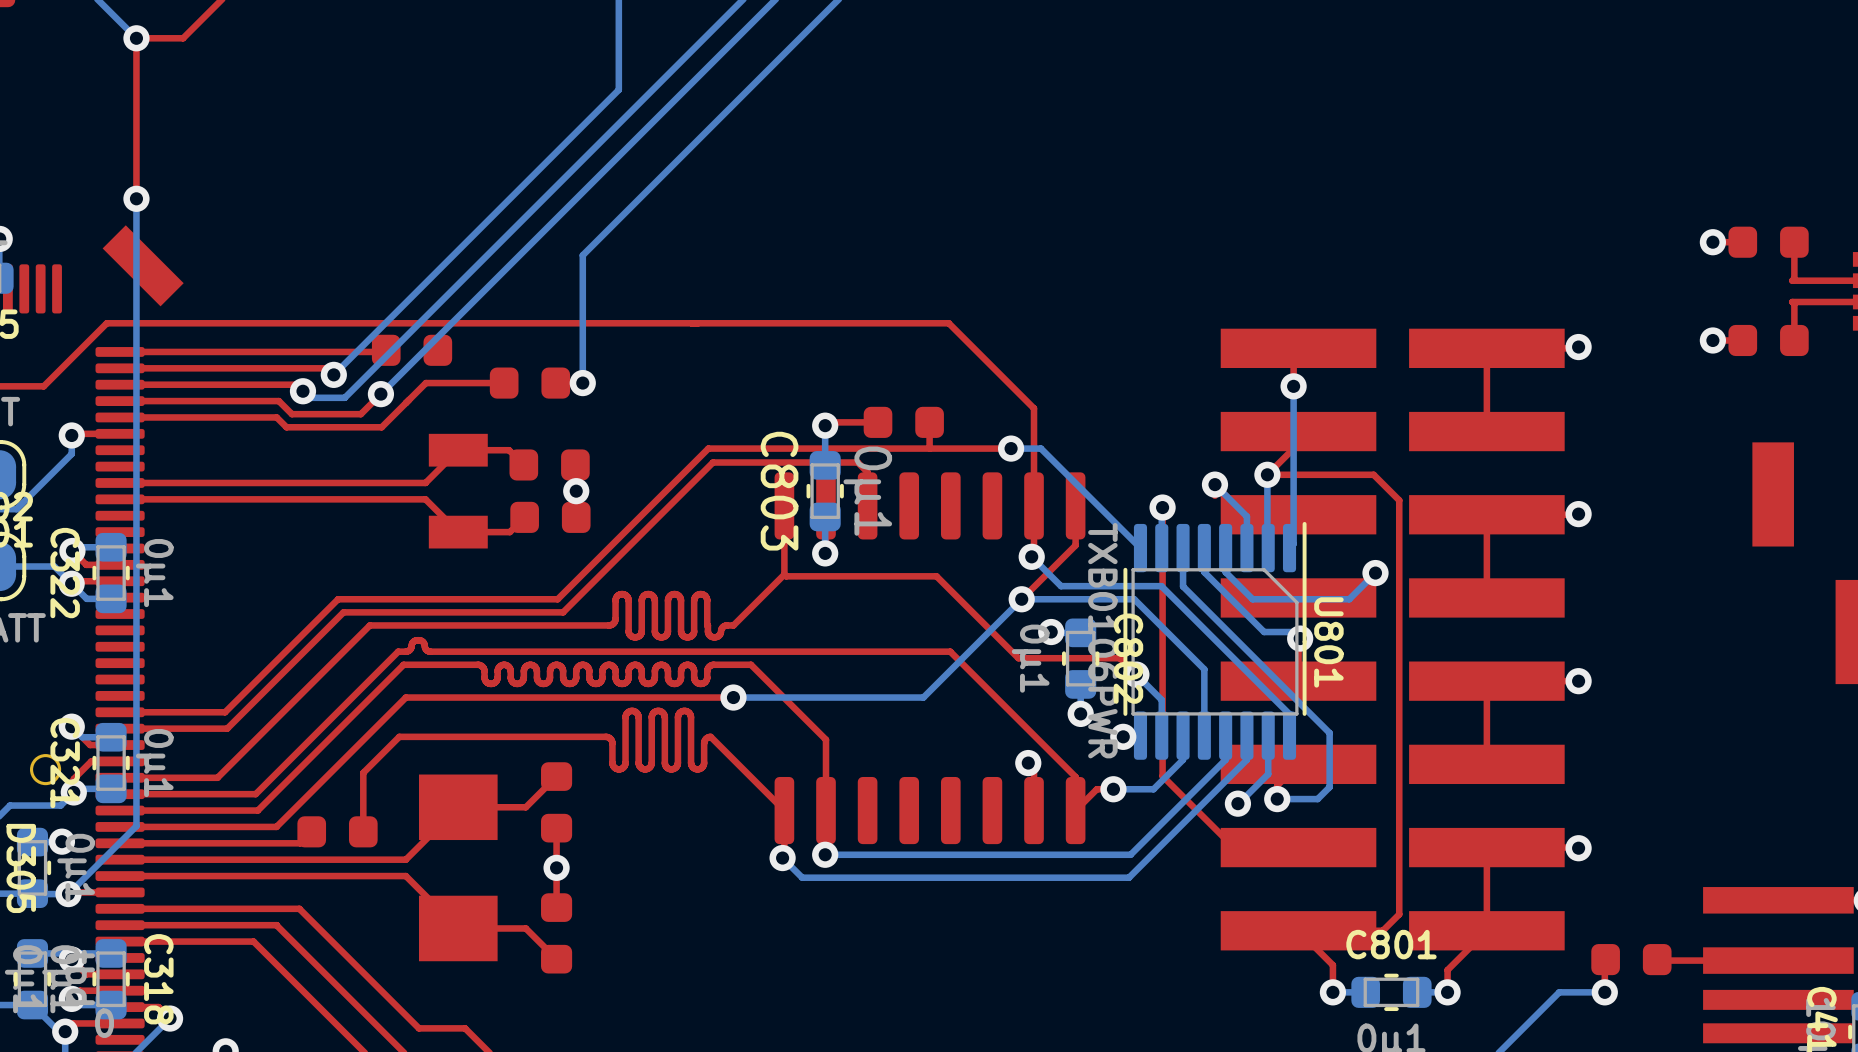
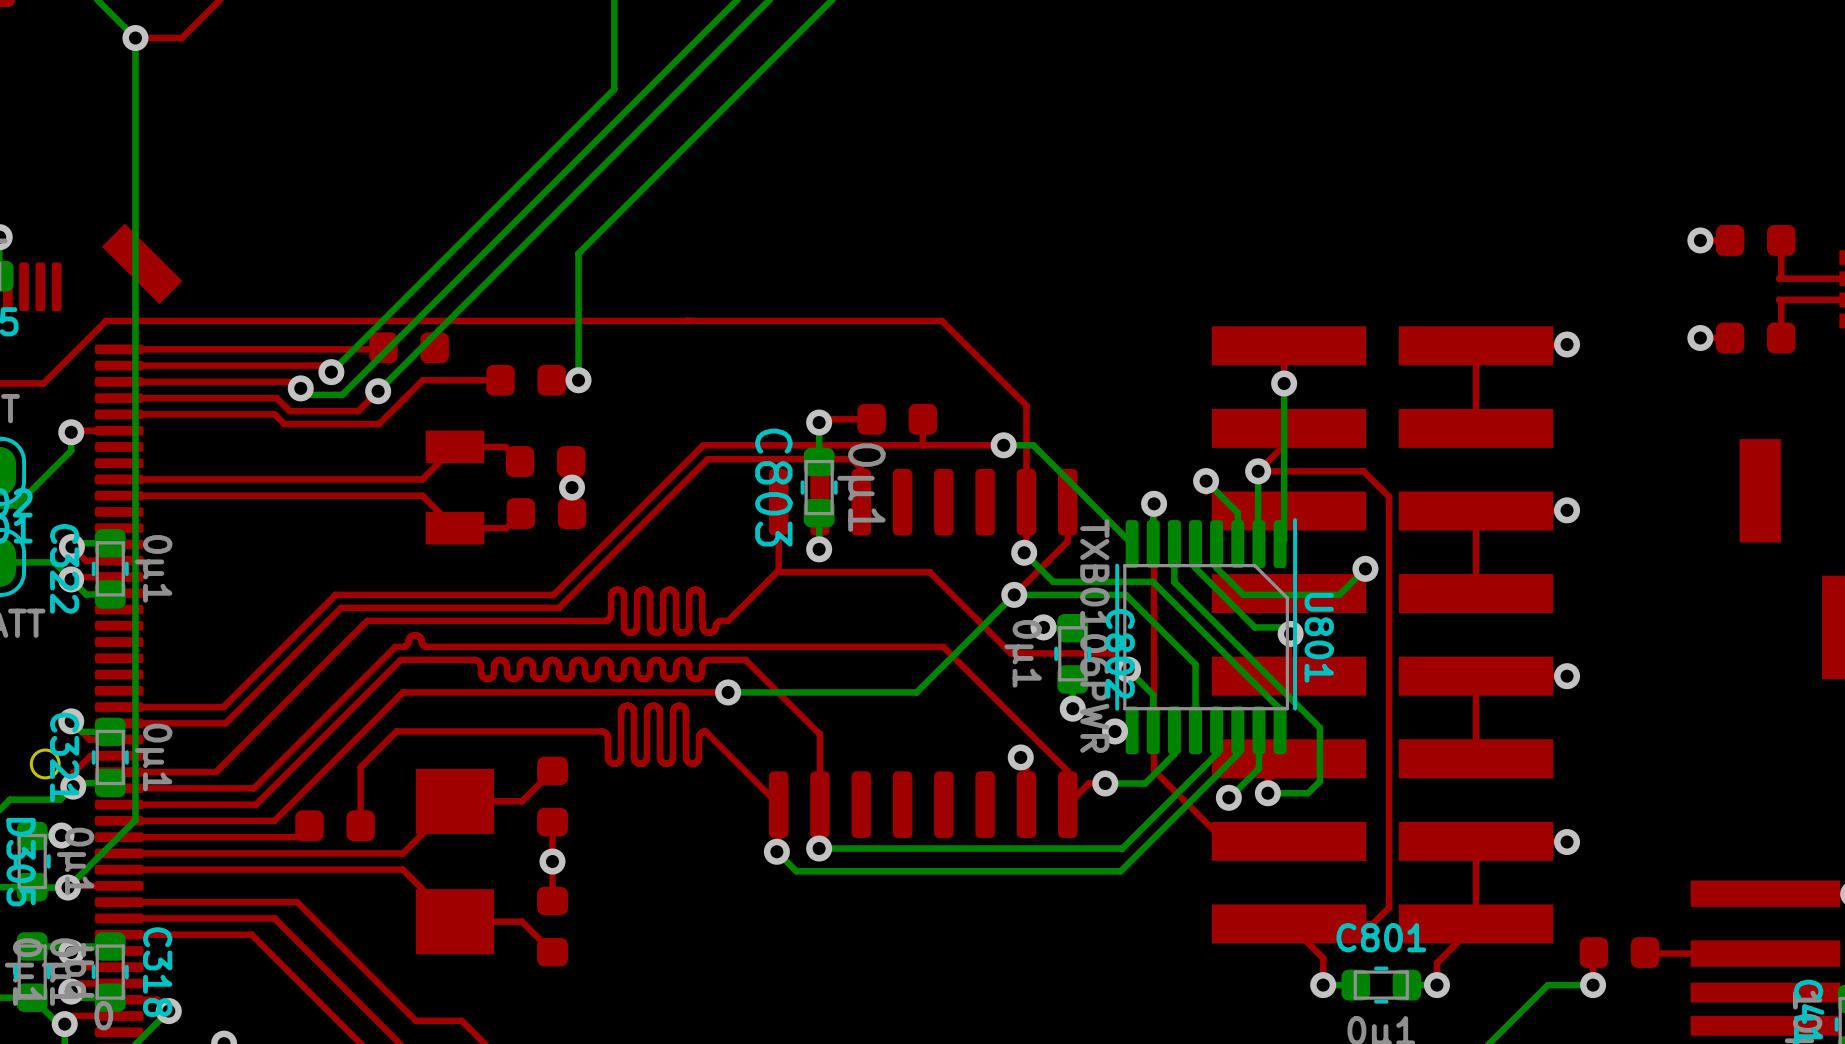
top track: (136, 38) (136, 198) -> none
bottom track: none -> (135, 38) (135, 197)
via: (136, 198) -> none

